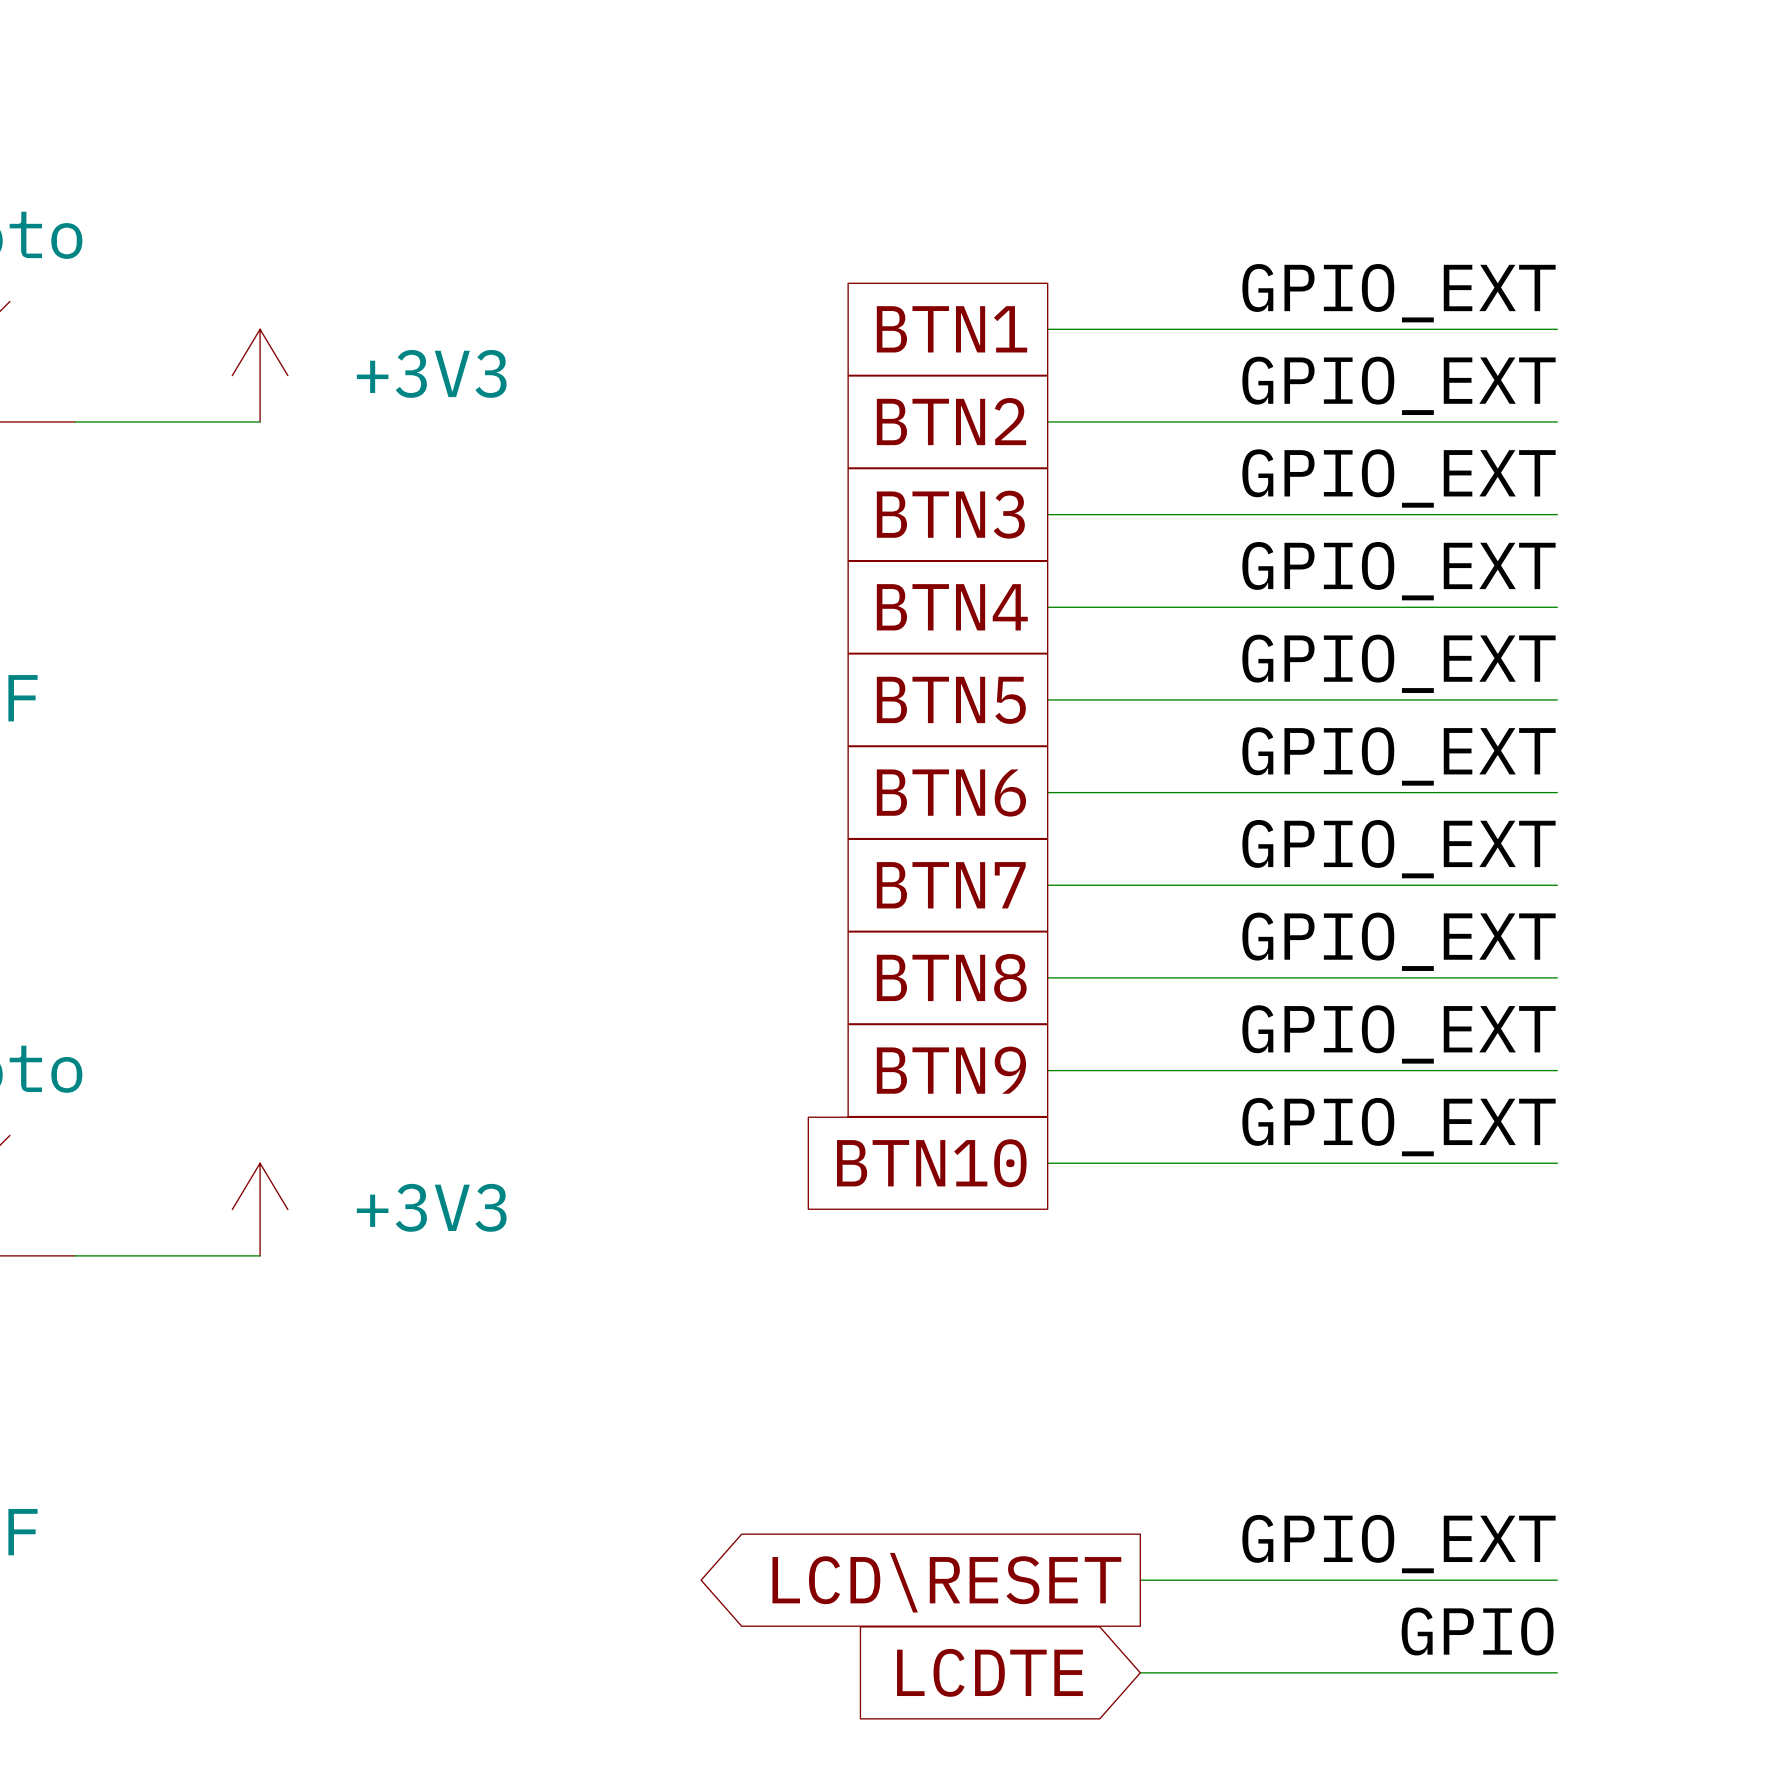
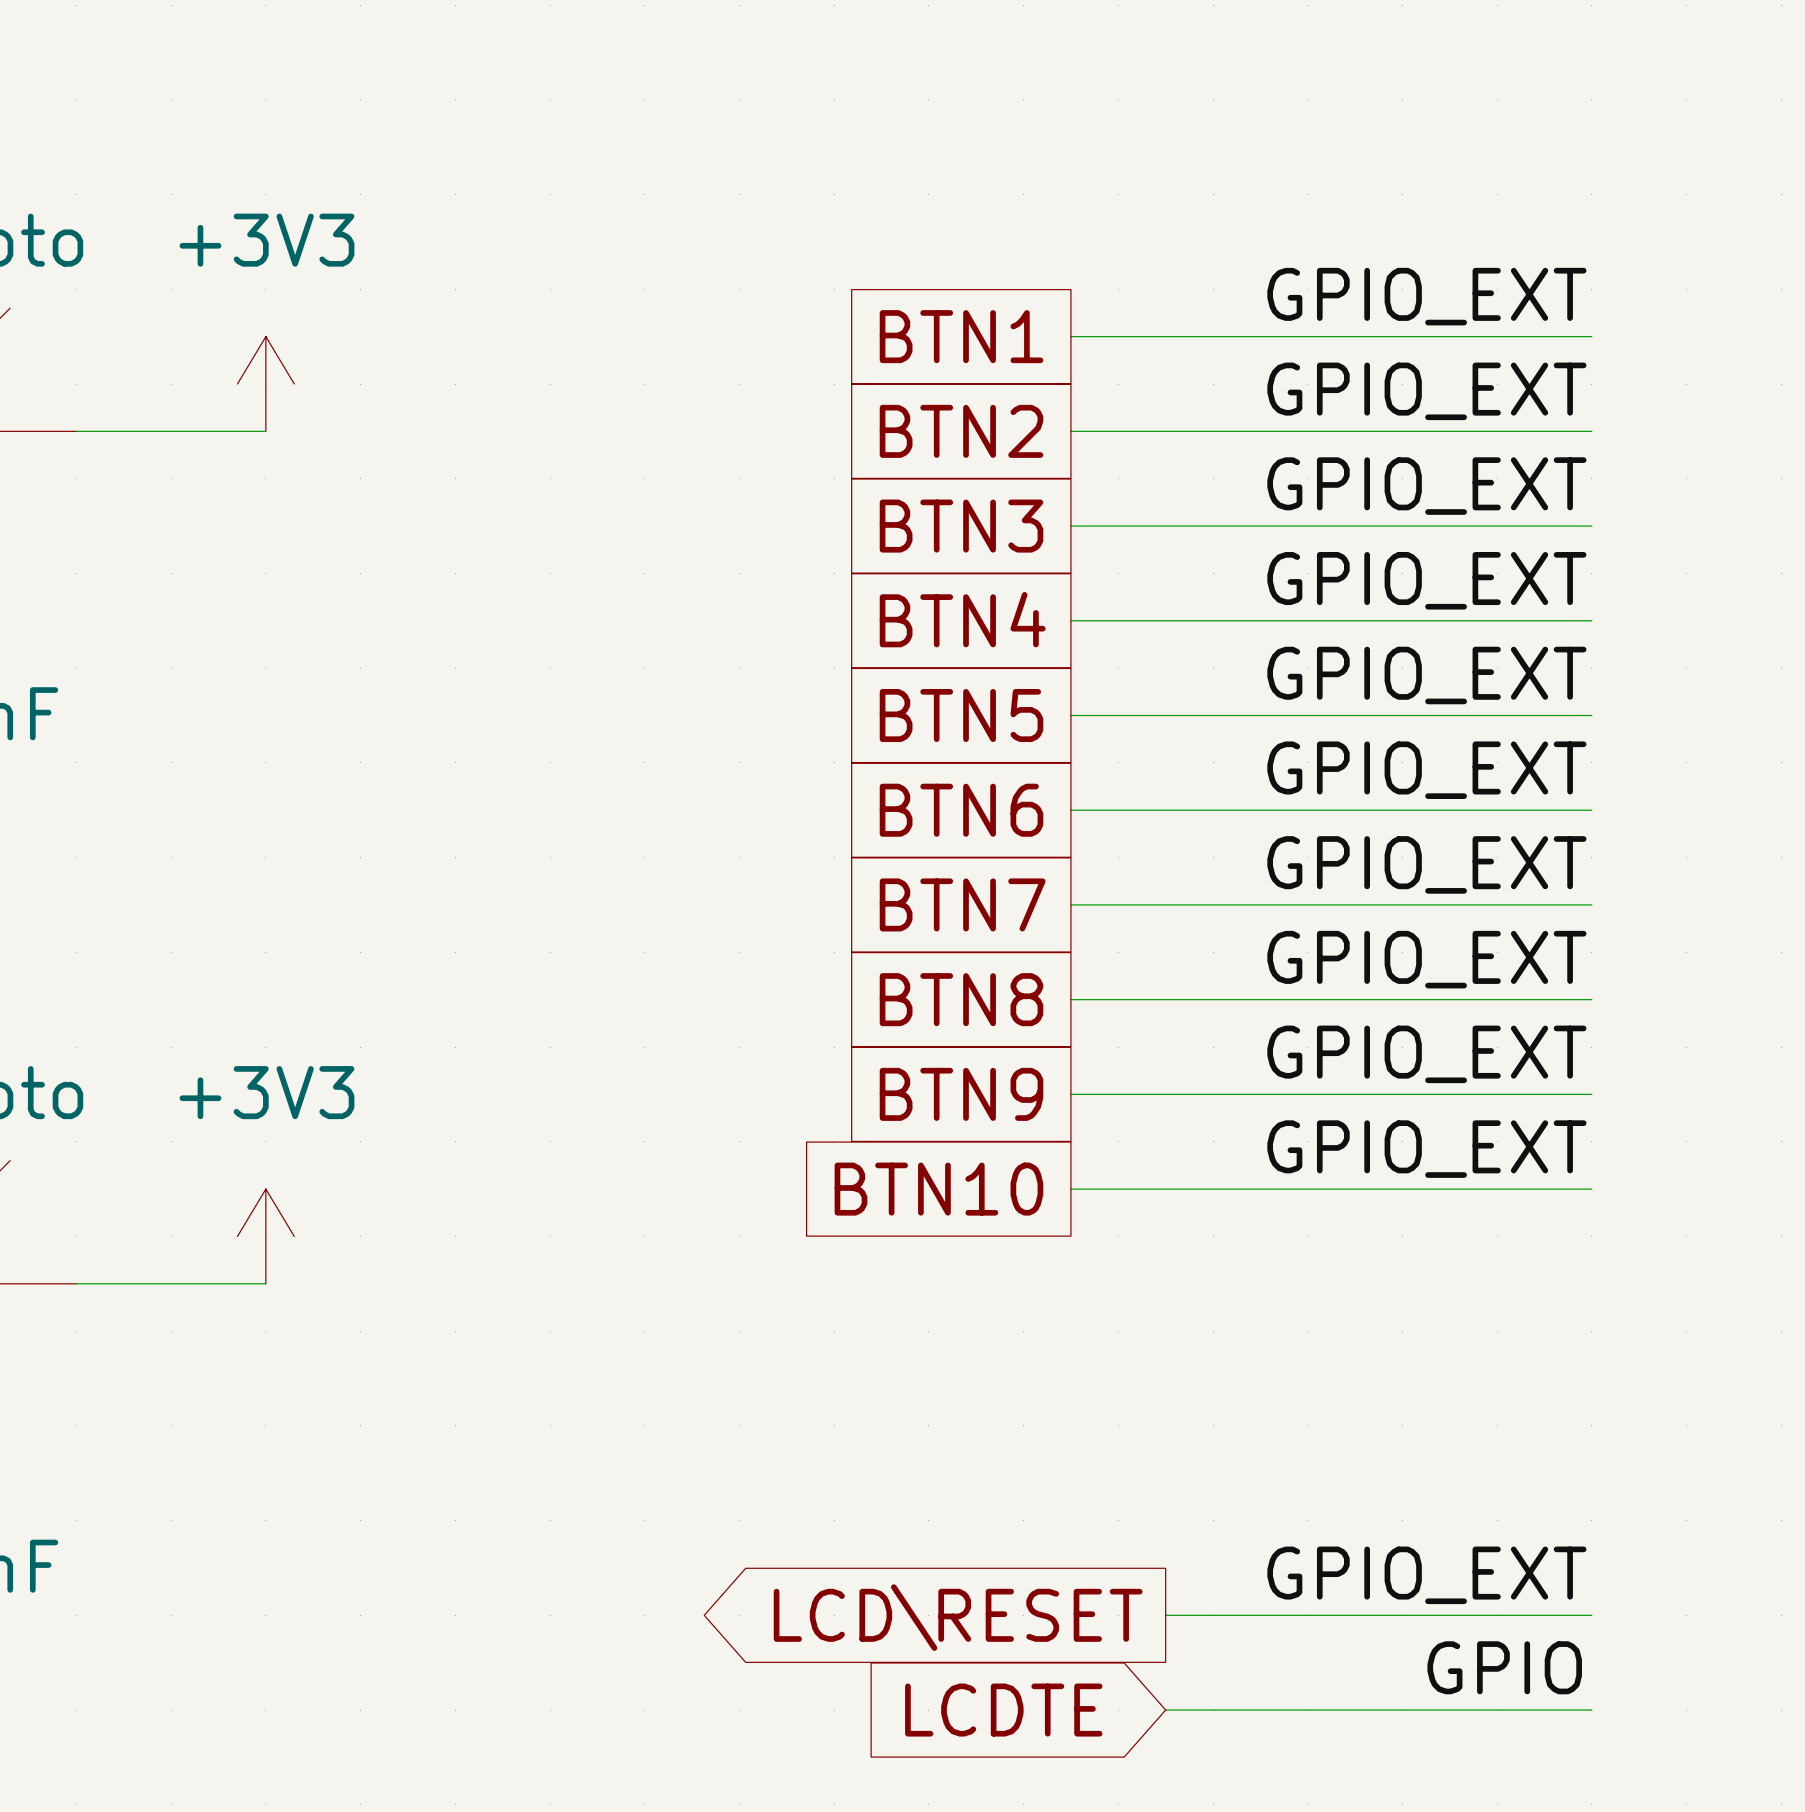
power symbol text position: +3V3 (431, 373) -> +3V3 (266, 240)
power symbol text position: +3V3 (431, 1207) -> +3V3 (266, 1092)

